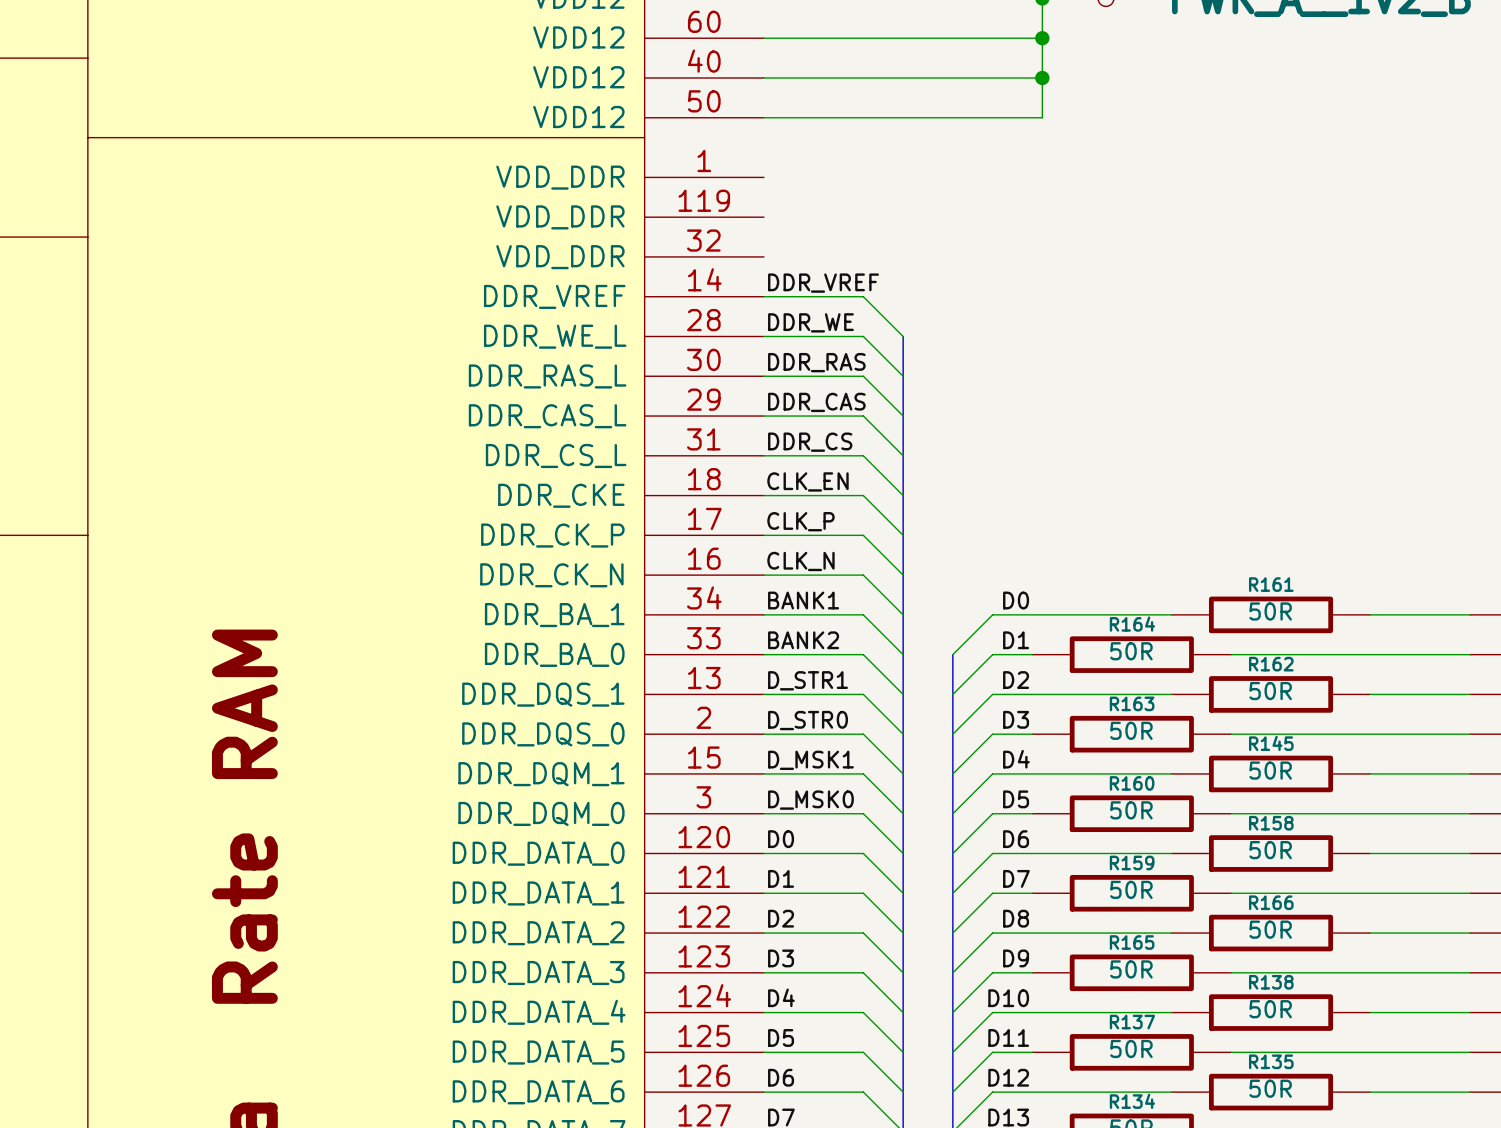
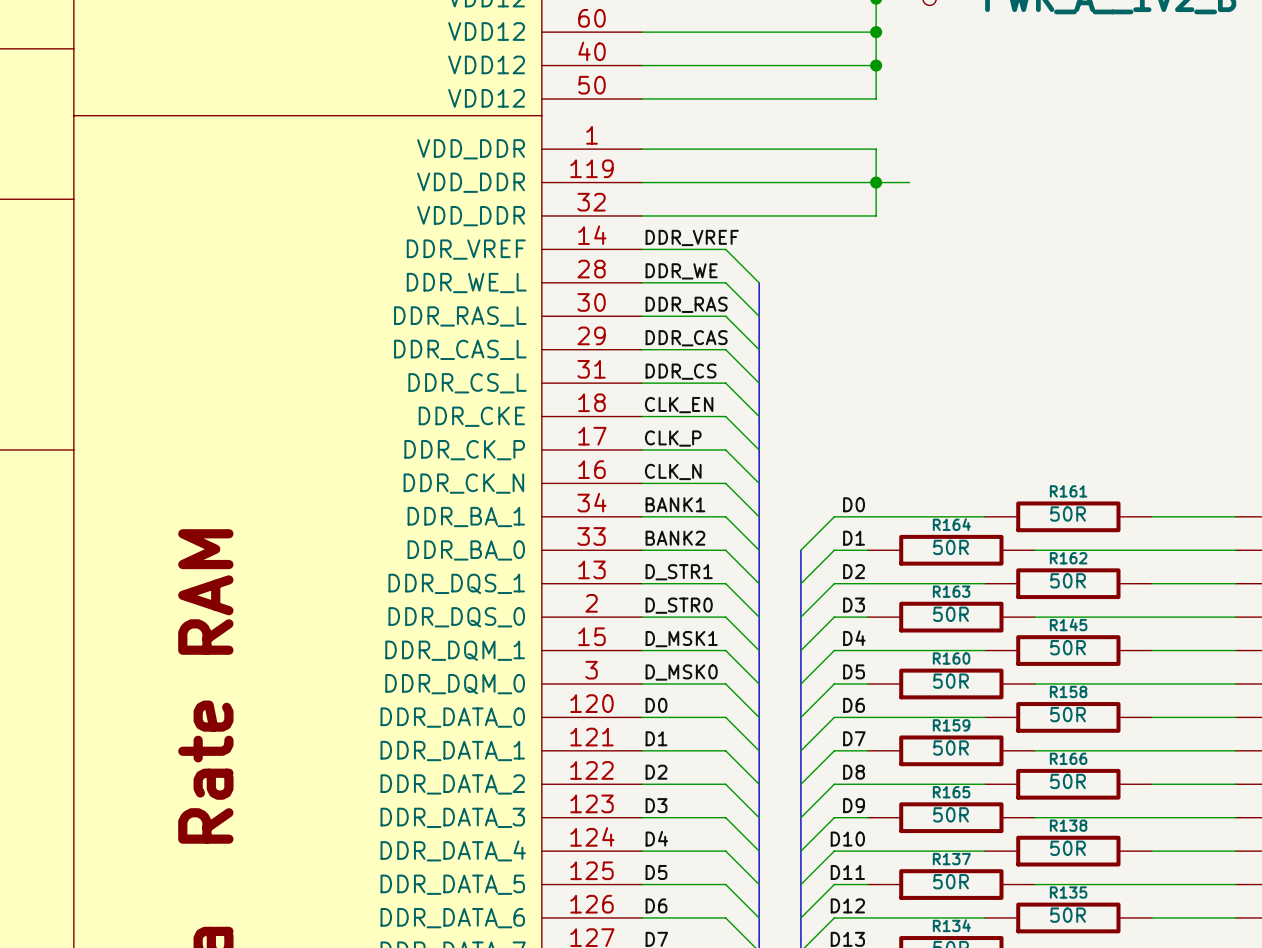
wire: none -> (642, 149) (876, 149) (876, 215) (642, 215)
wire: none -> (642, 182) (909, 182)
junction: none -> (876, 182)

